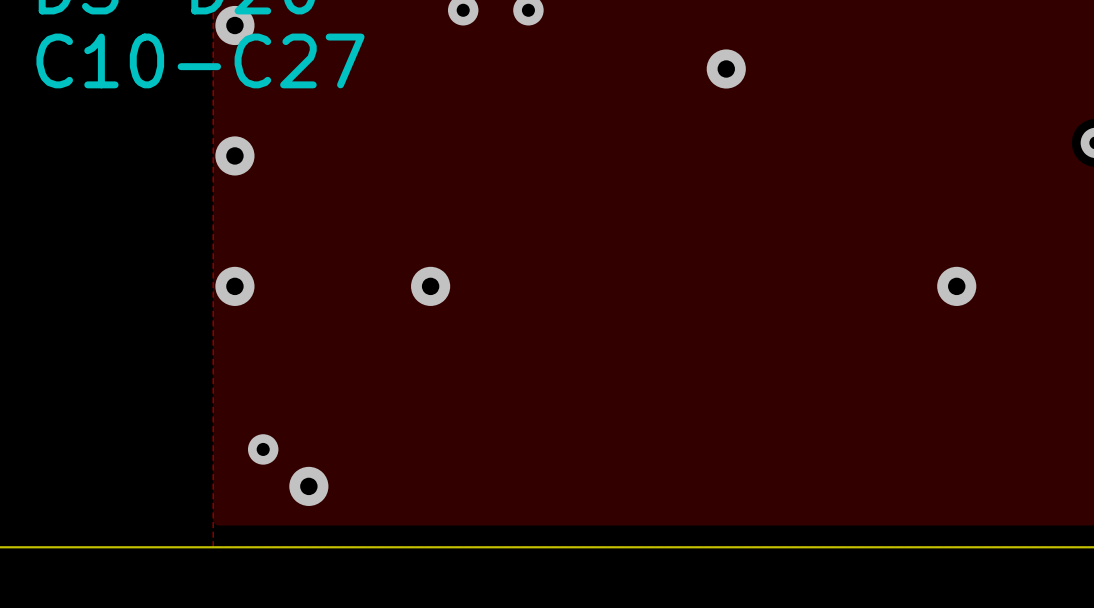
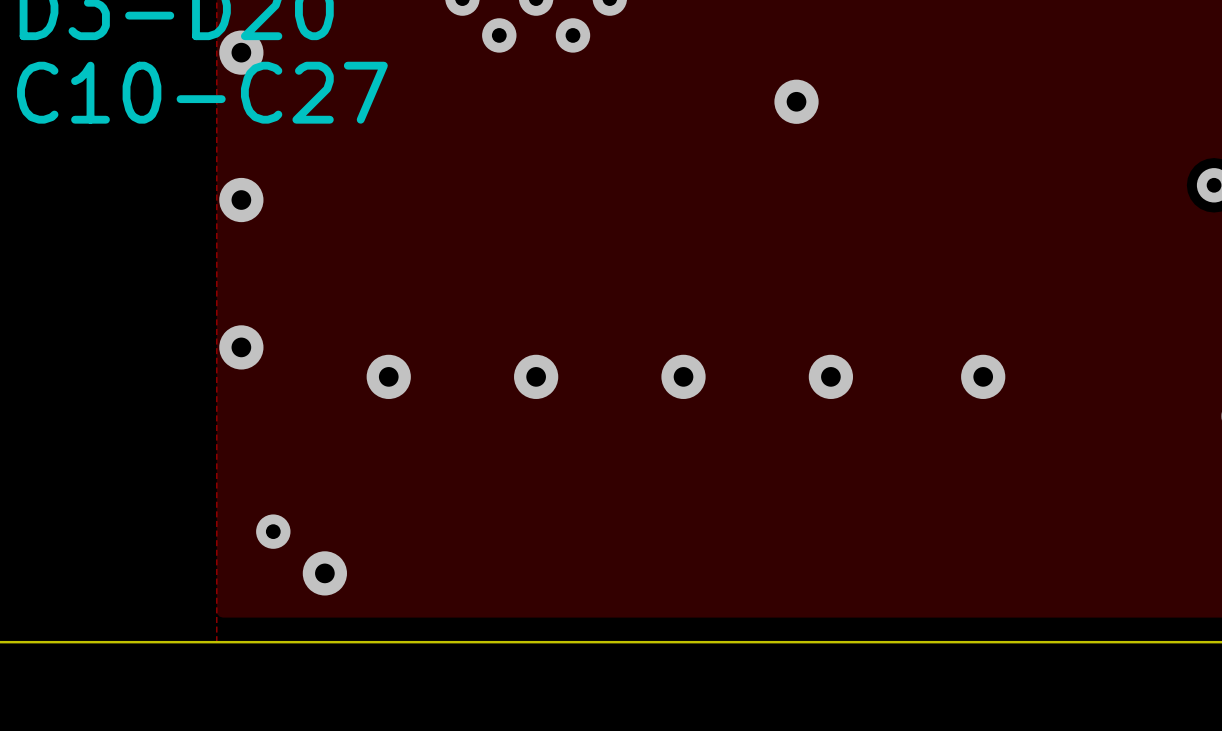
via: (430, 286) -> none
via position: (956, 286) -> (983, 376)
via: none -> (388, 376)
via: none -> (536, 376)
via: none -> (683, 376)
via: none -> (830, 376)

